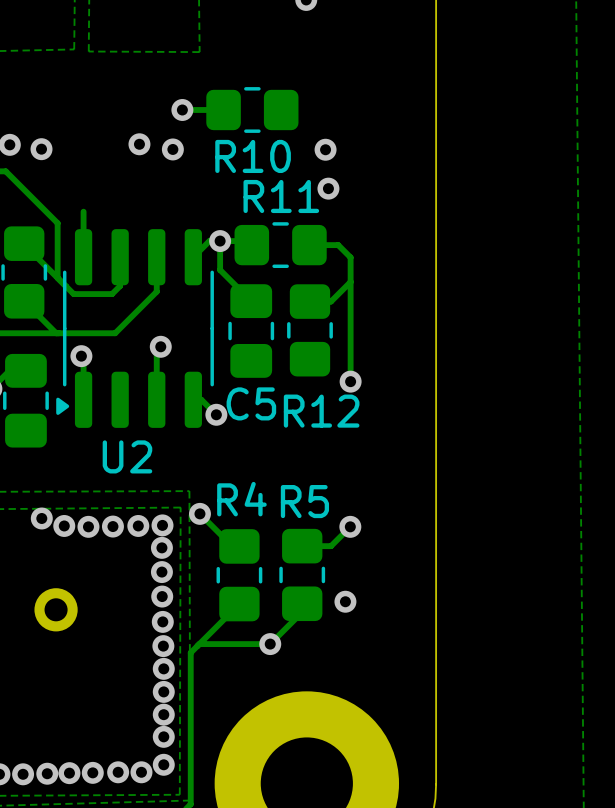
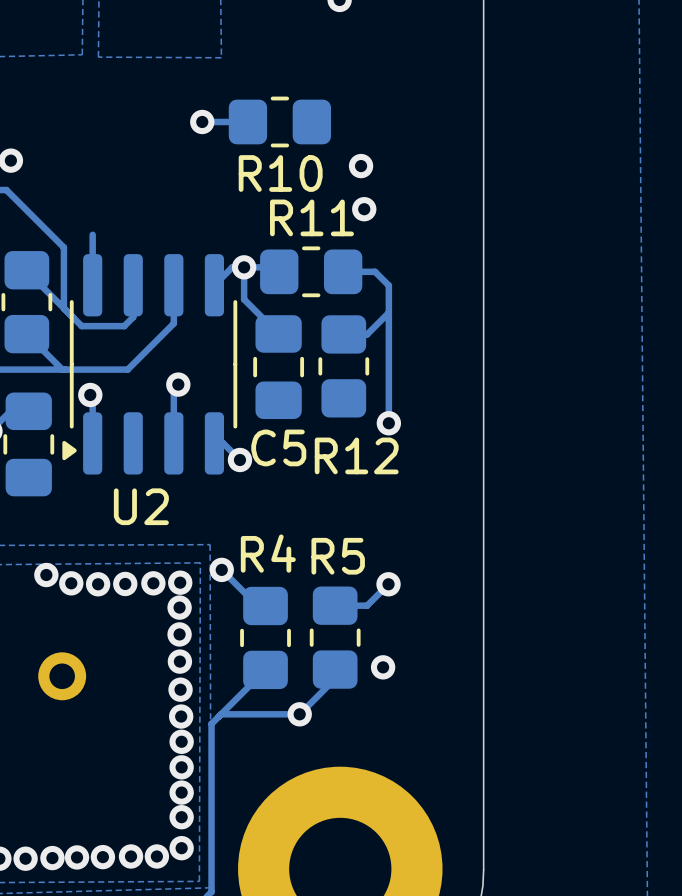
via: (139, 144) -> none
via: (41, 149) -> none
via: (172, 149) -> none

